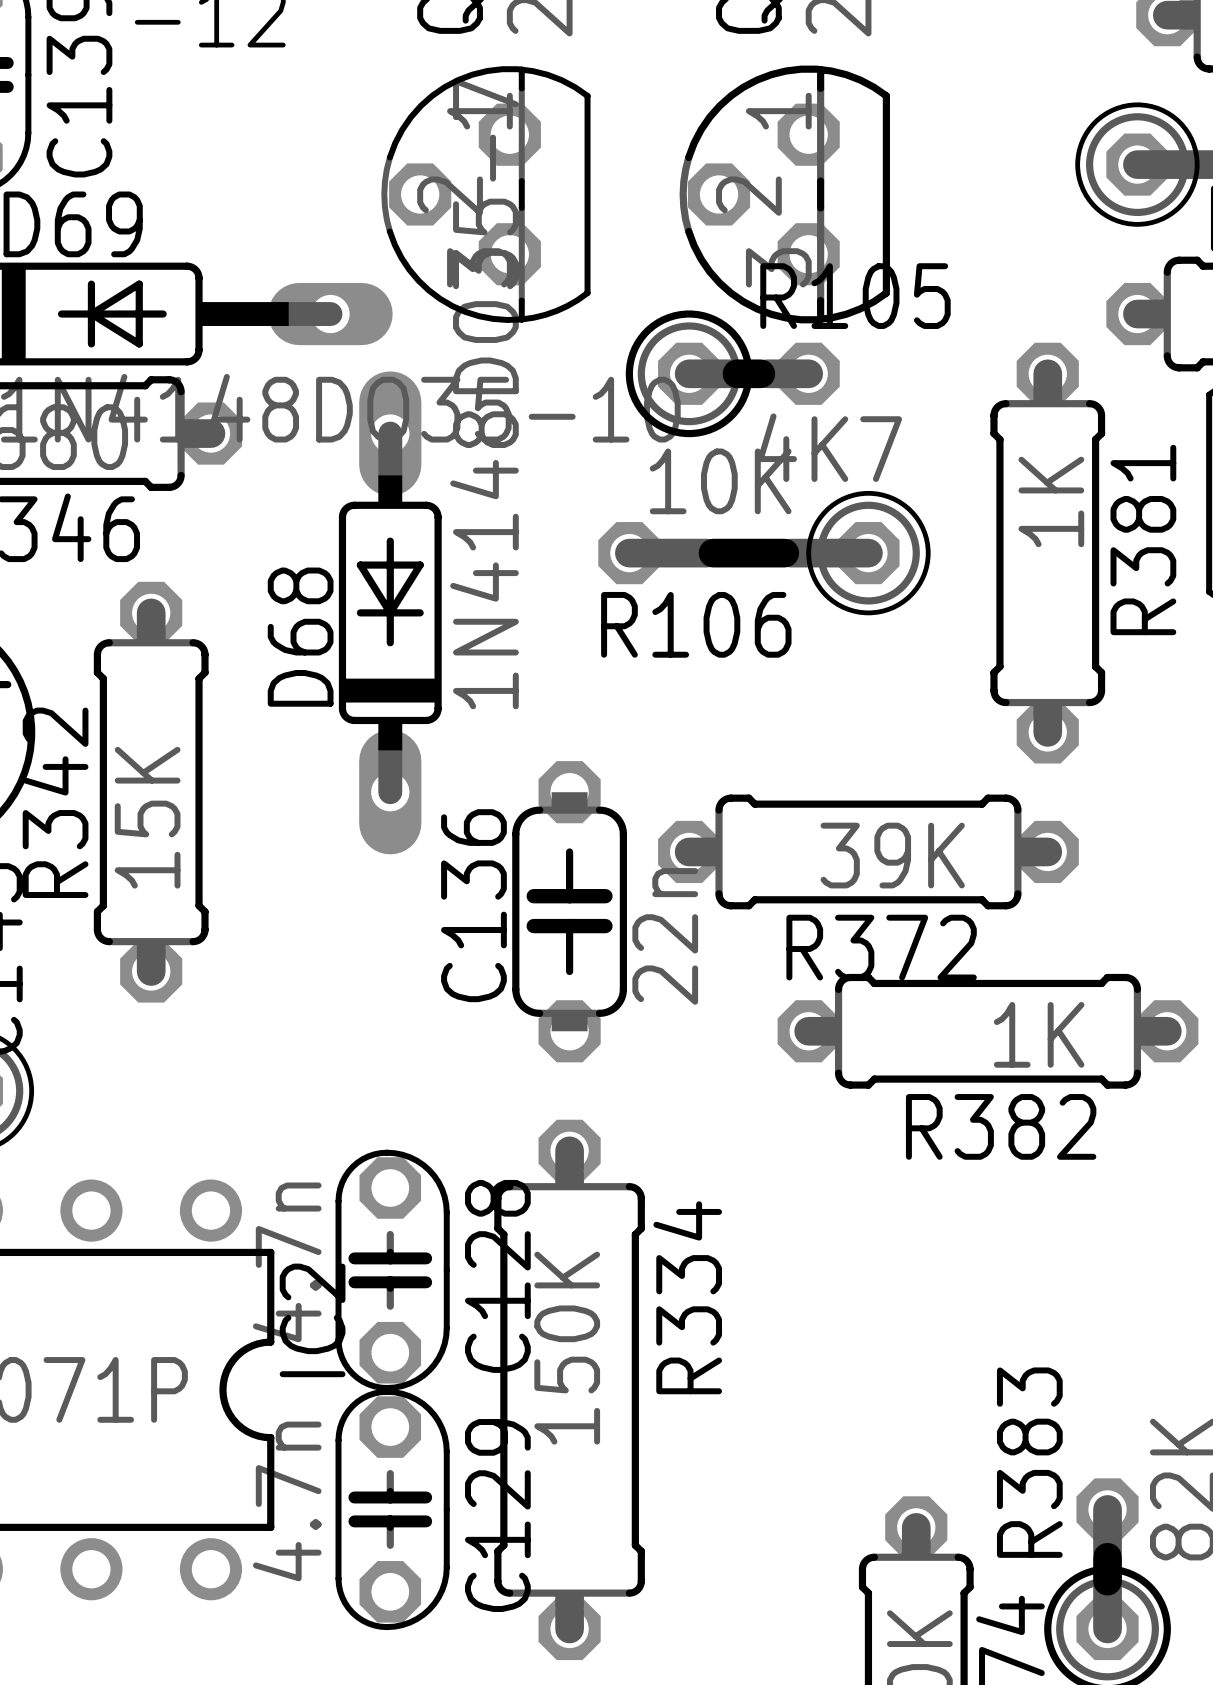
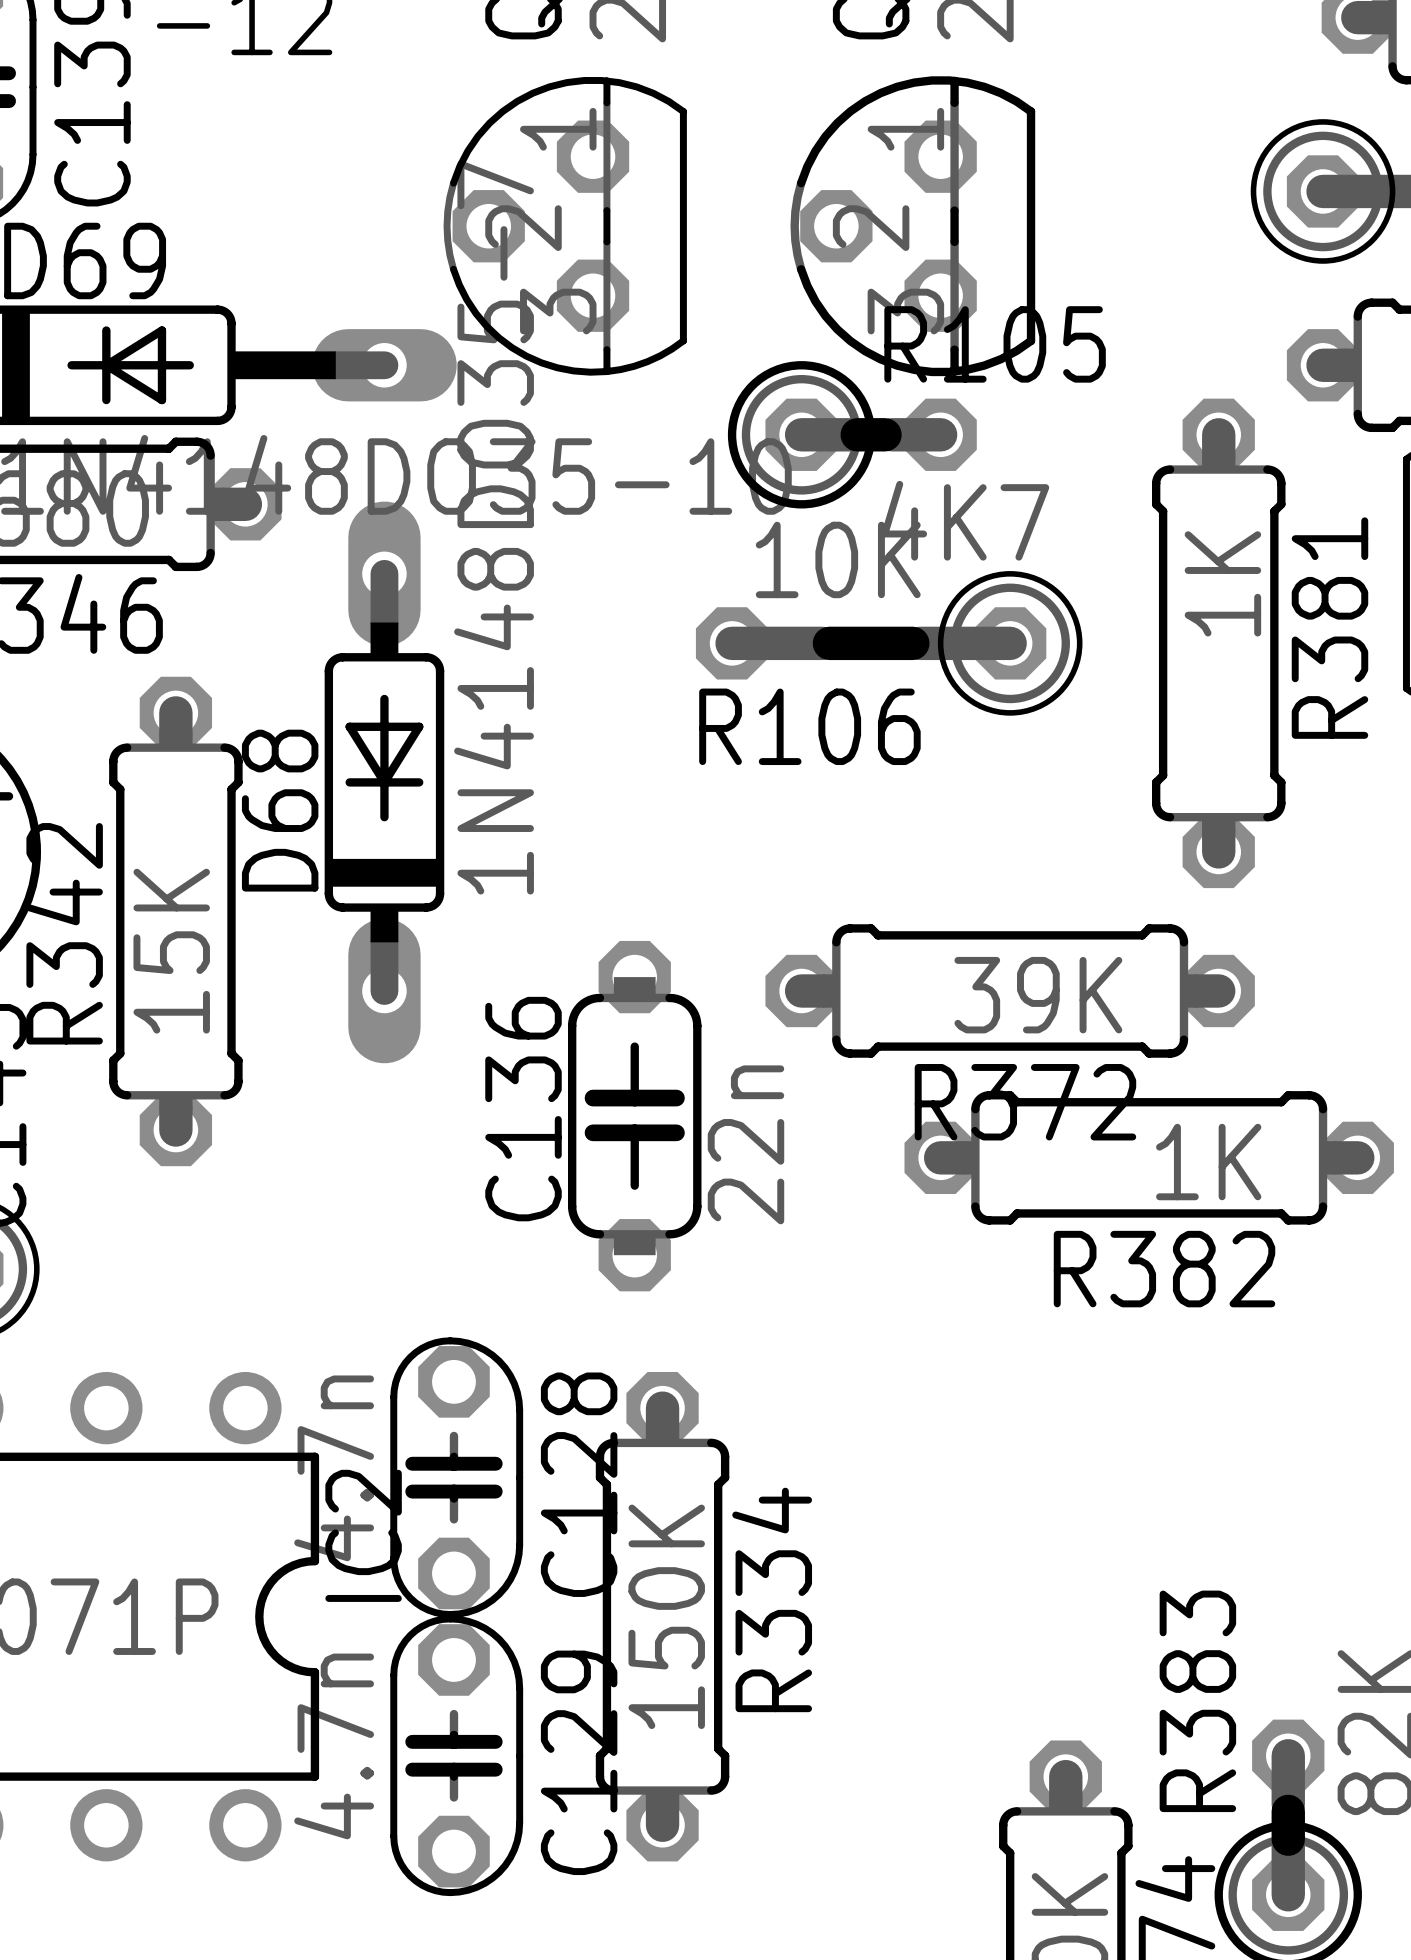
D68 position: (390, 612) -> (384, 782)
C136 position: (569, 911) -> (634, 1116)
R382 position: (987, 1031) -> (1149, 1157)
R334 footprint: [494, 1119, 645, 1661] -> [595, 1371, 730, 1862]

